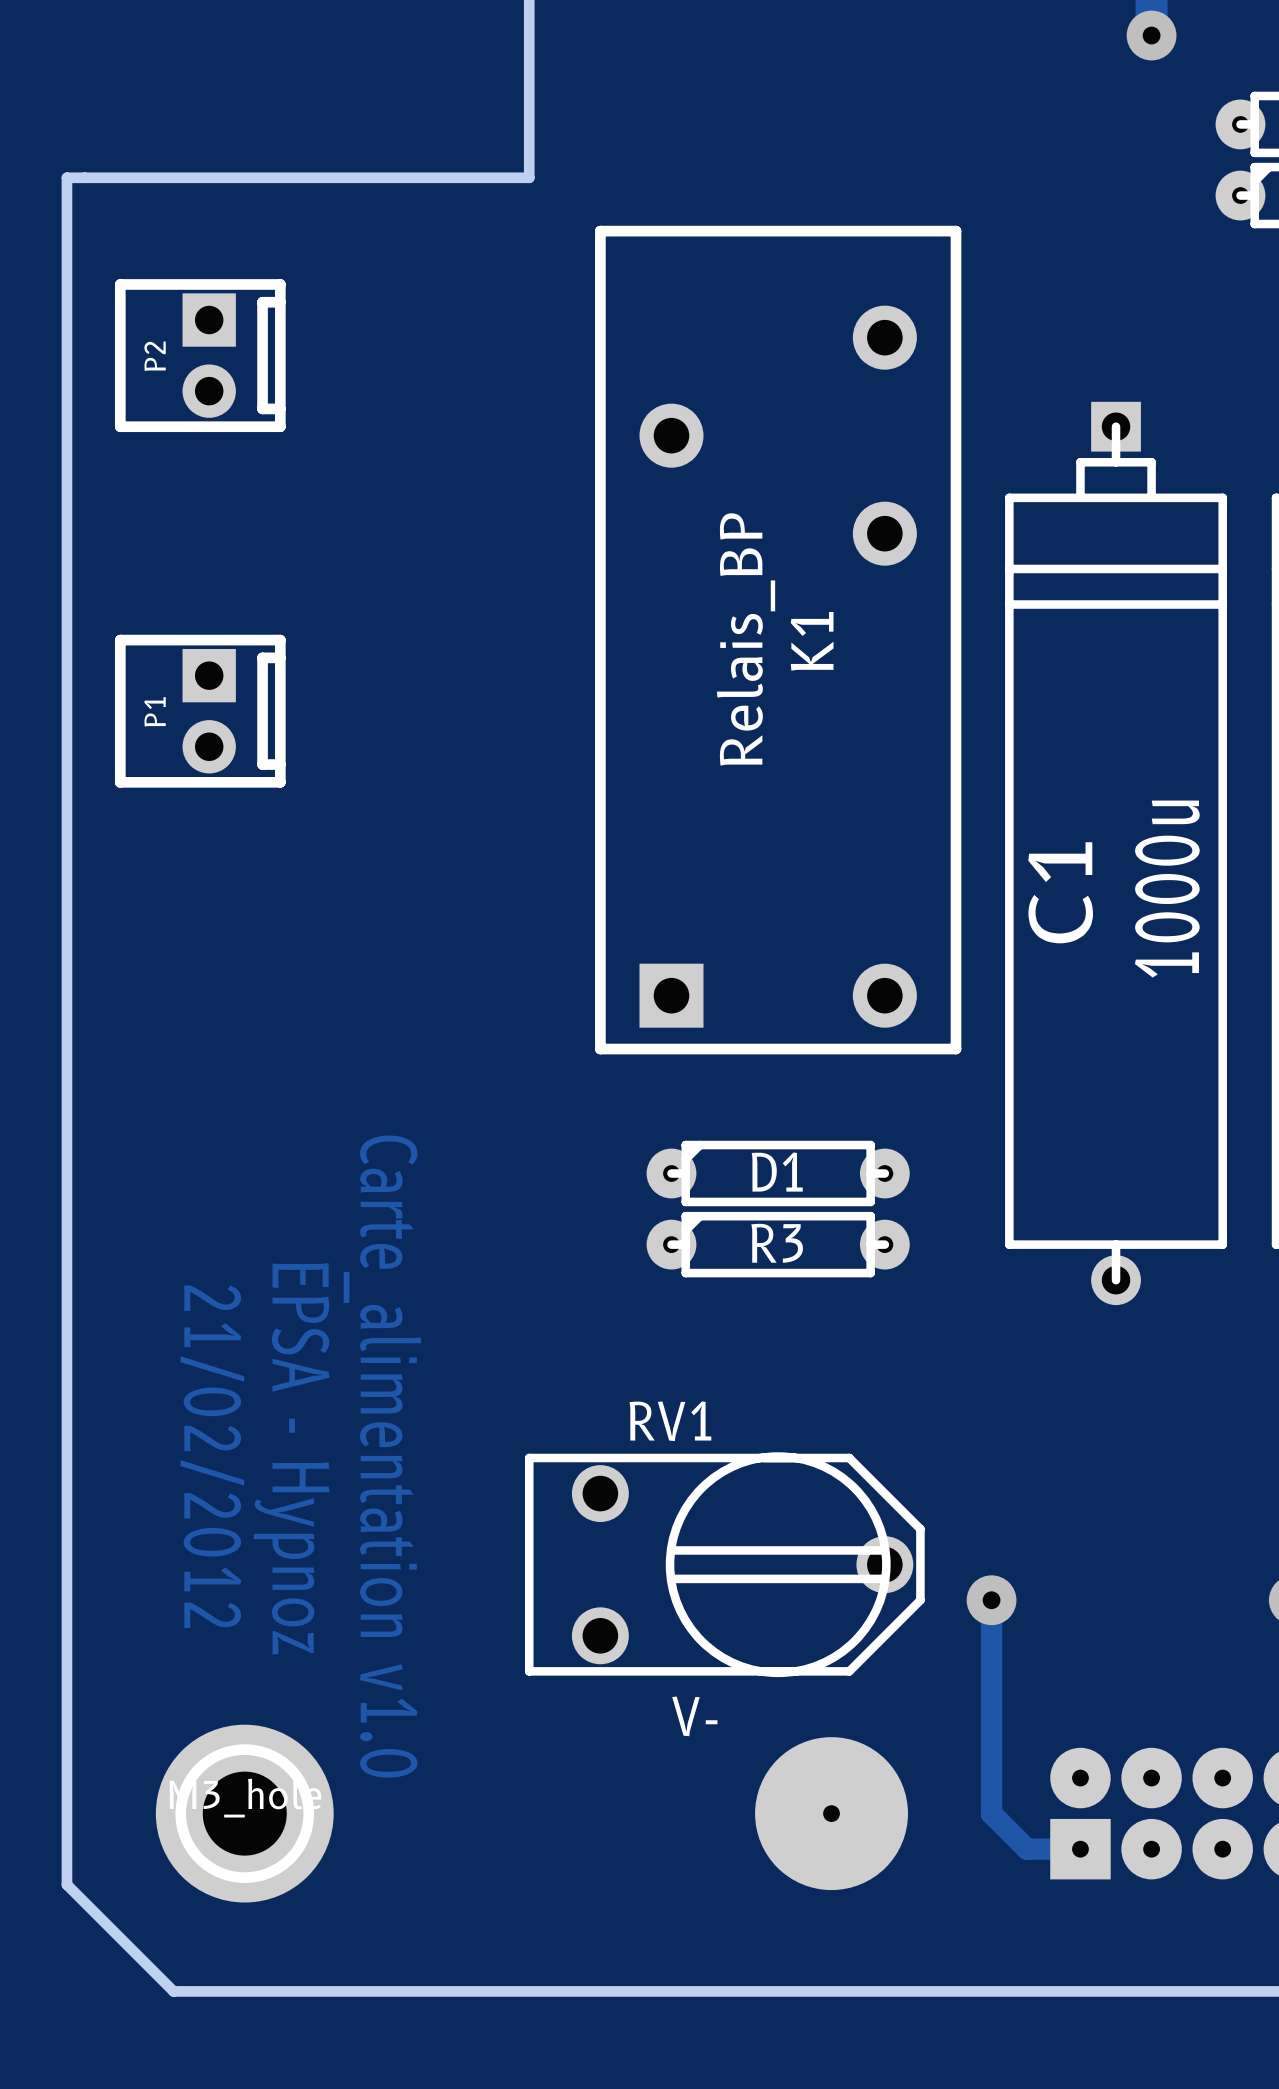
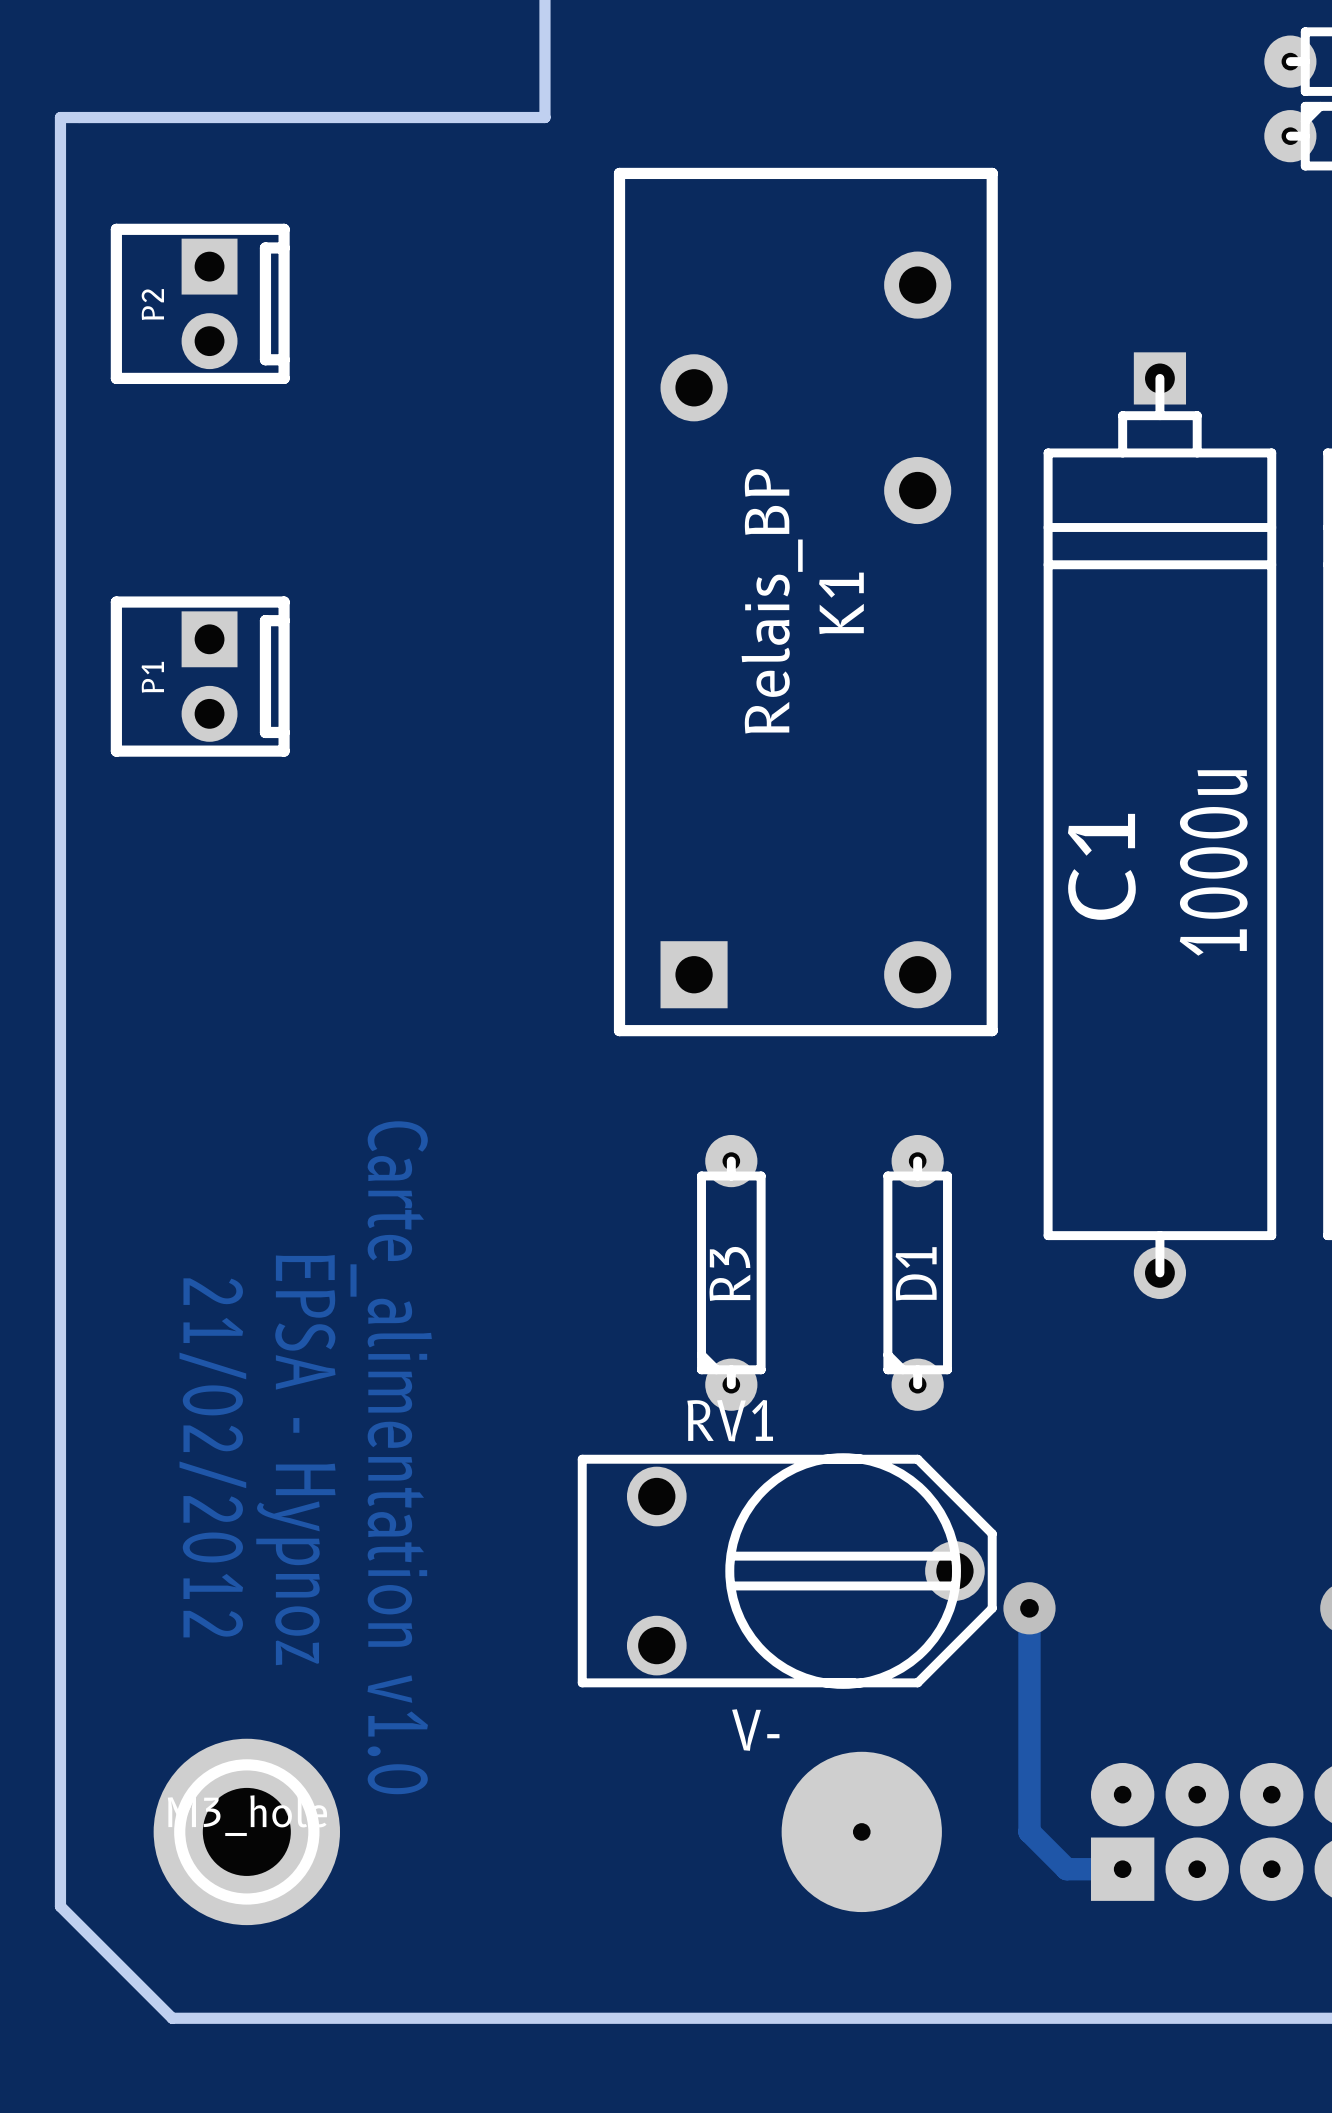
D1 rotation: 0° (778, 1173) -> 90° counterclockwise (917, 1272)
R3 rotation: 0° (778, 1244) -> 90° counterclockwise (731, 1272)
RV1 position: (724, 1564) -> (787, 1571)

